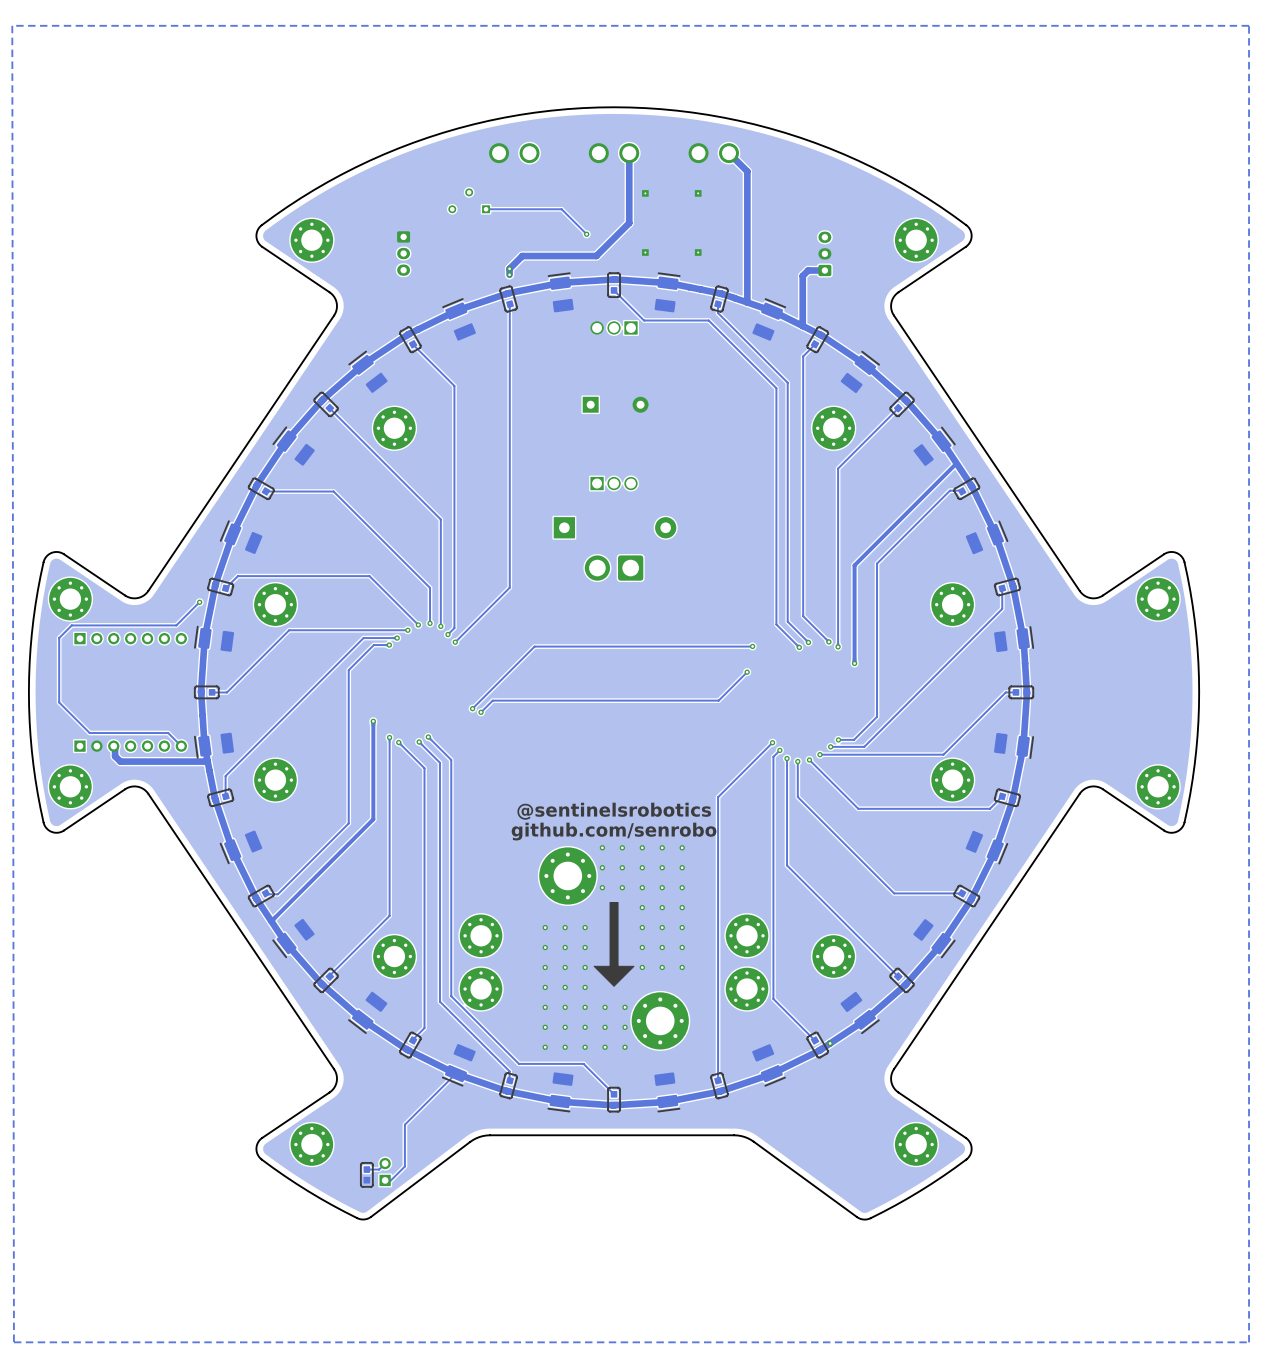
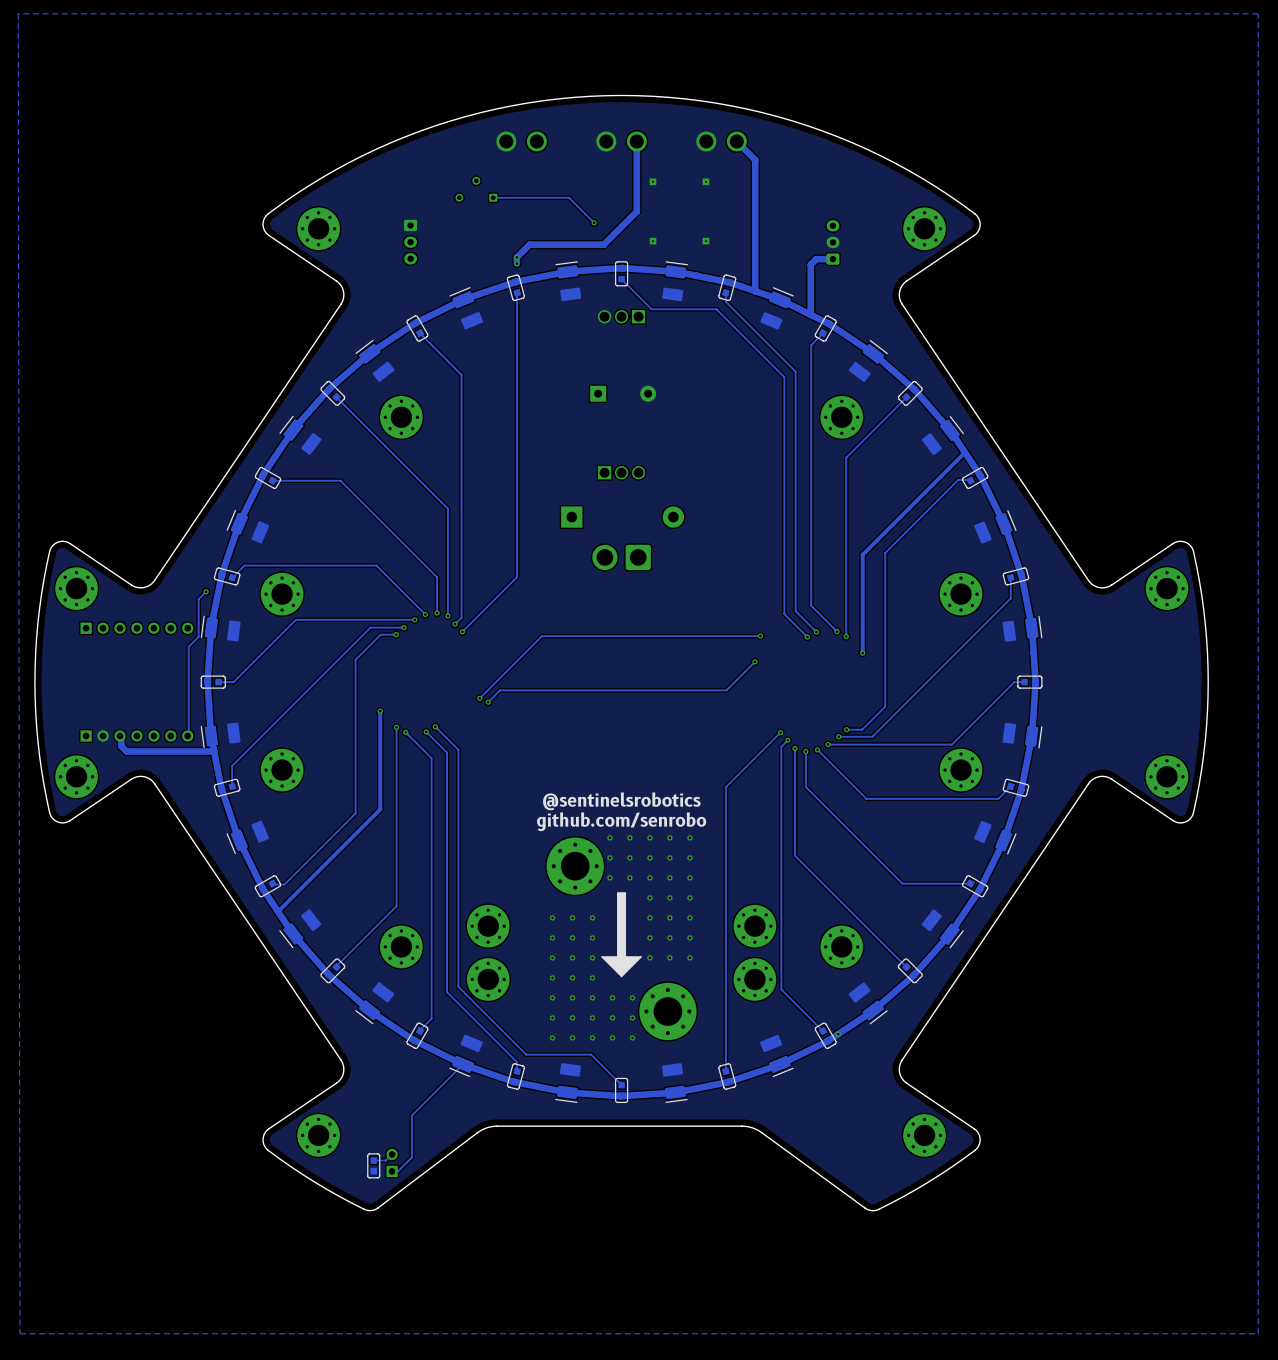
track: (199, 602) (176, 625) (71, 625) (59, 638) (59, 702) (89, 733) (168, 733) (181, 746) -> (206, 591) (198, 599) (198, 636) (188, 646) (188, 735)

